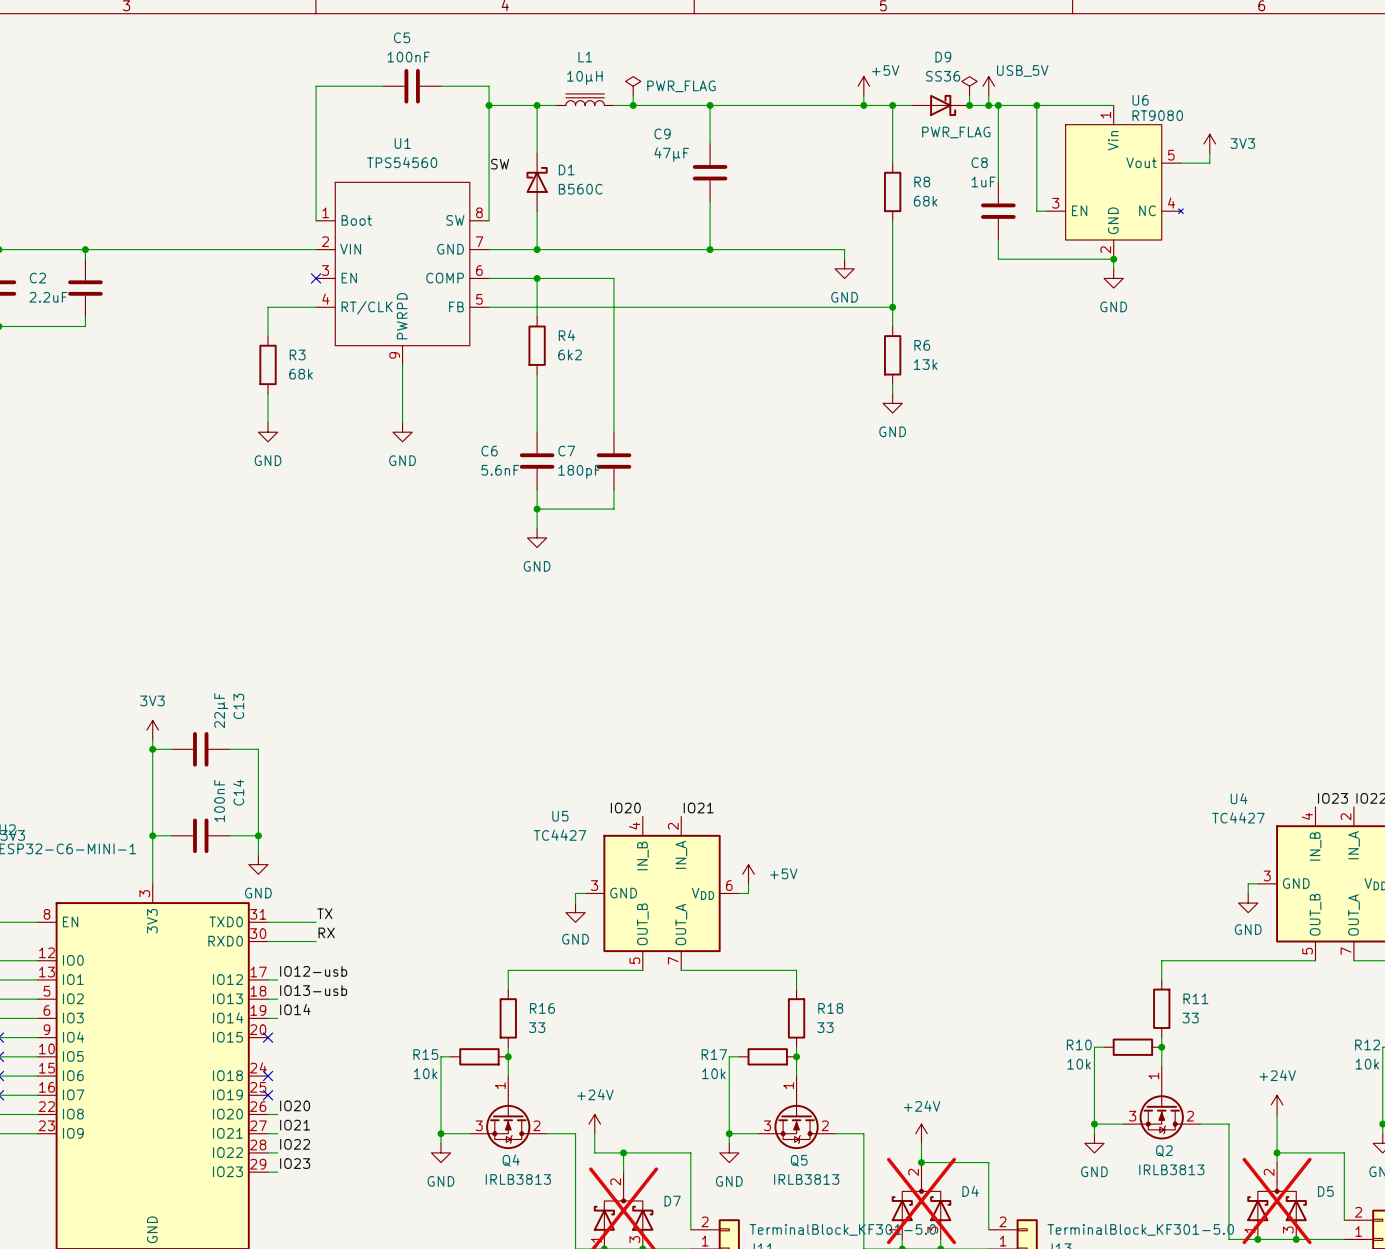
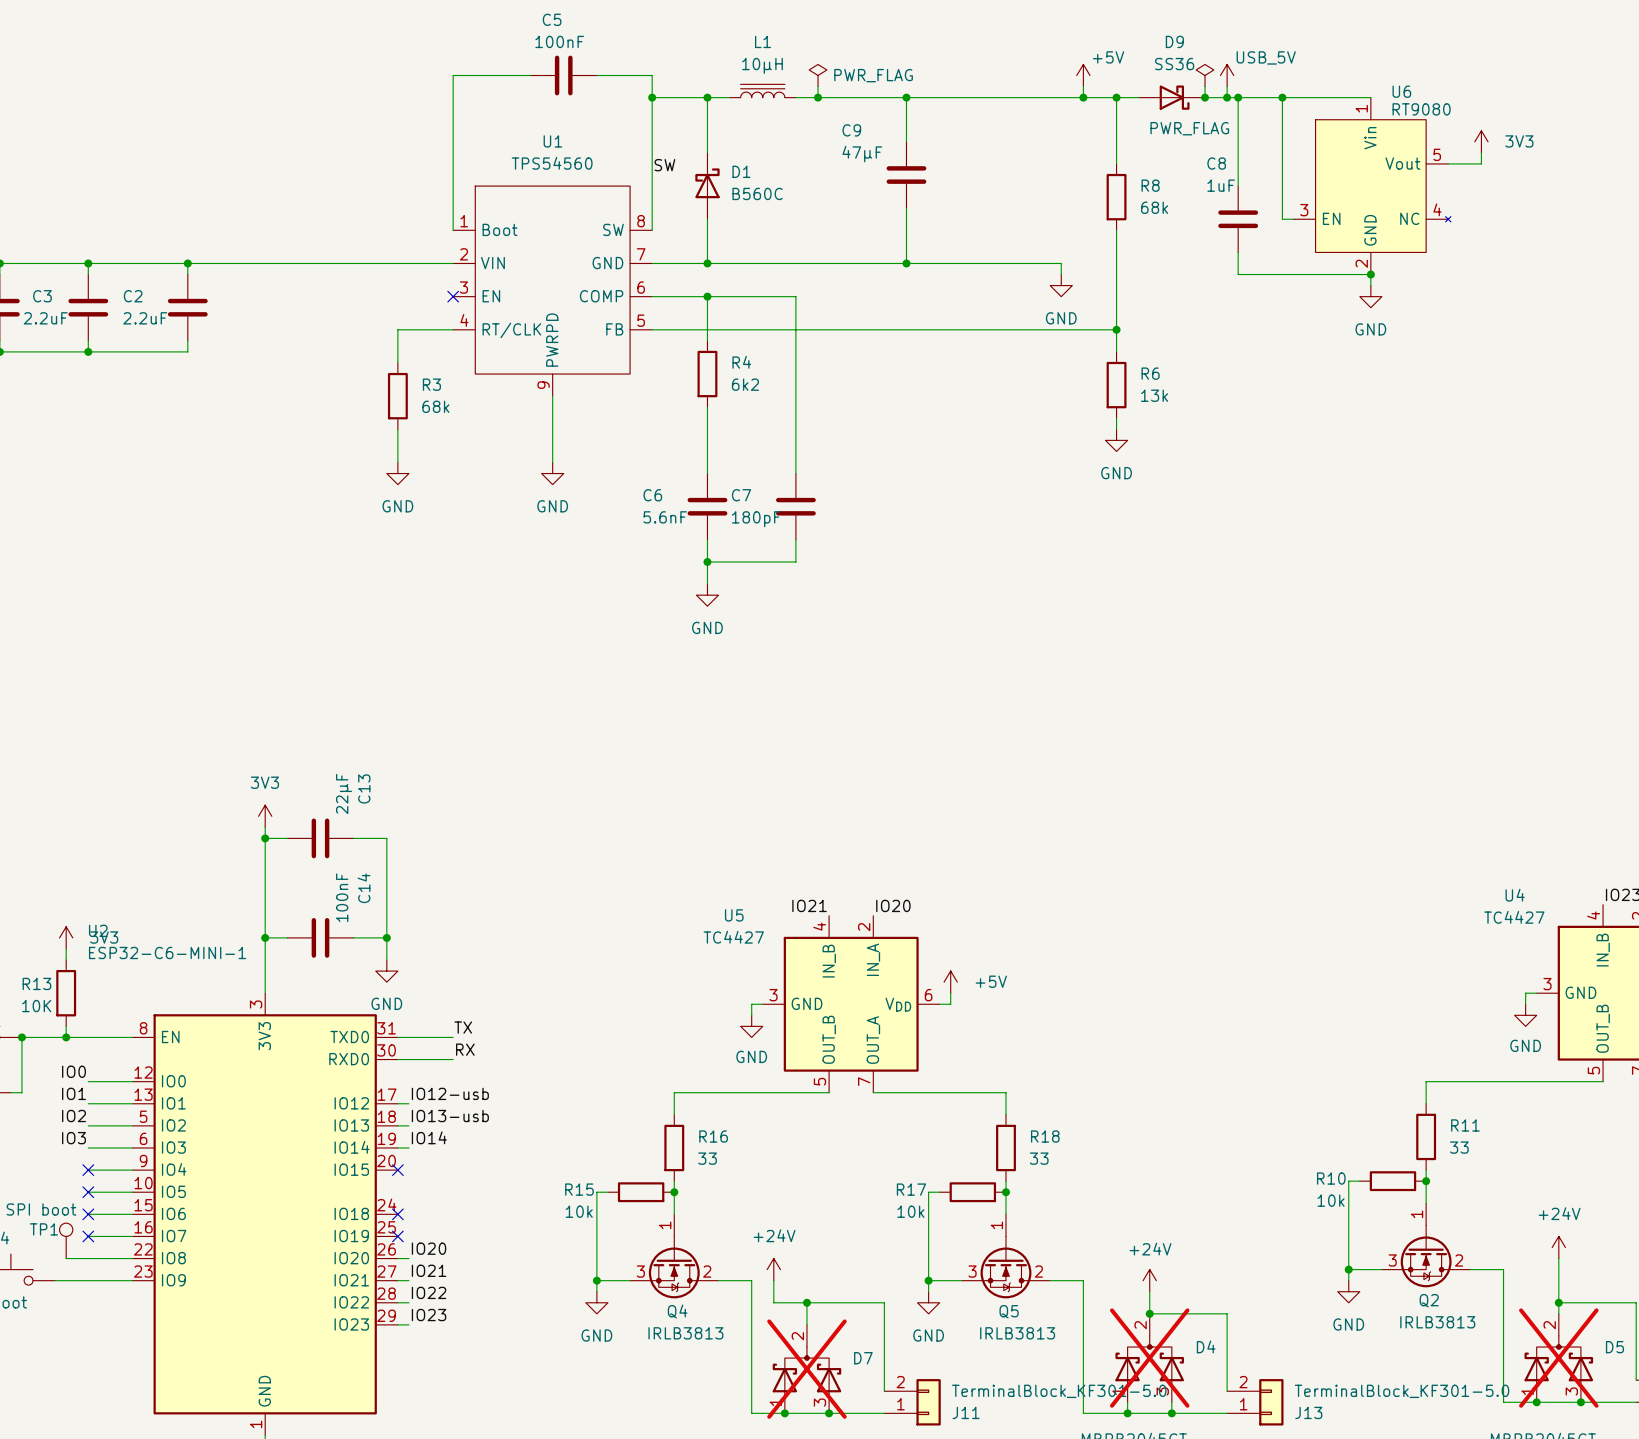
label: IO20 (625, 808) -> IO21 (809, 905)
label: IO21 (698, 808) -> IO20 (893, 905)

